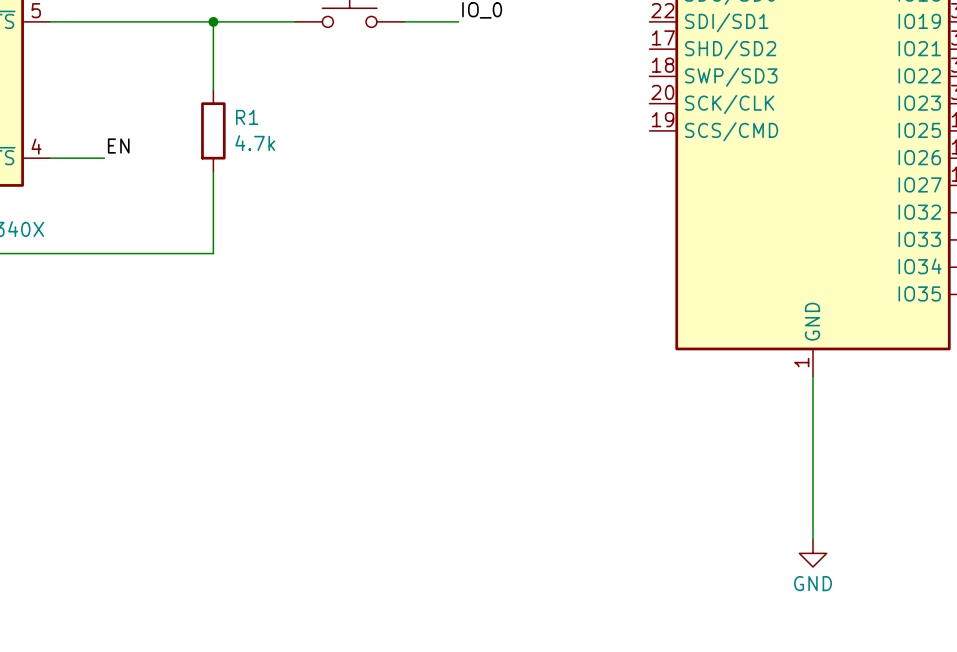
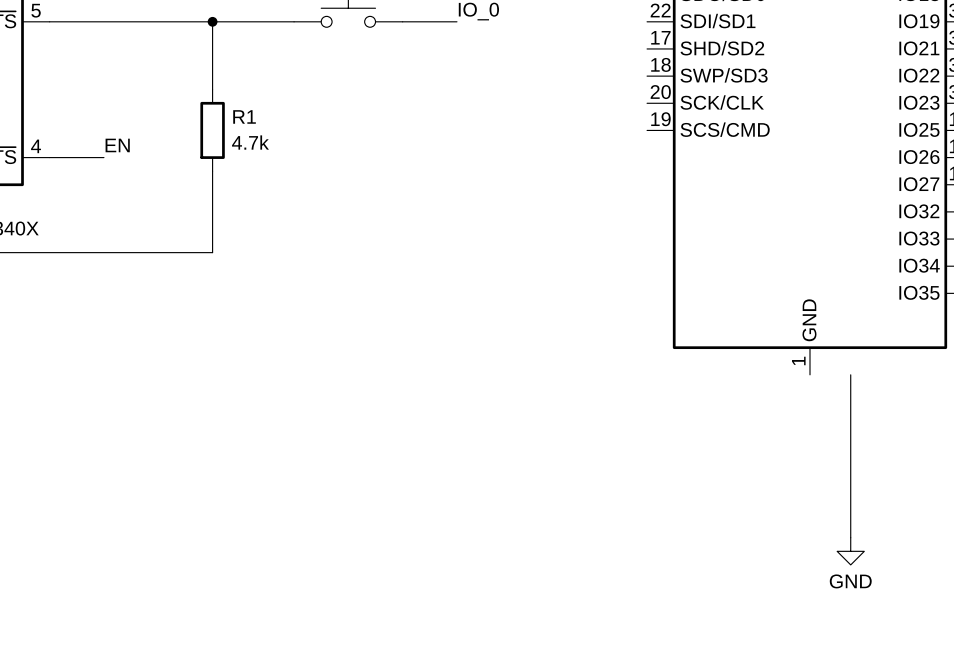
wire: (813, 376) (813, 539) -> (850, 374) (850, 537)
power symbol position: GND (813, 553) -> GND (850, 551)

